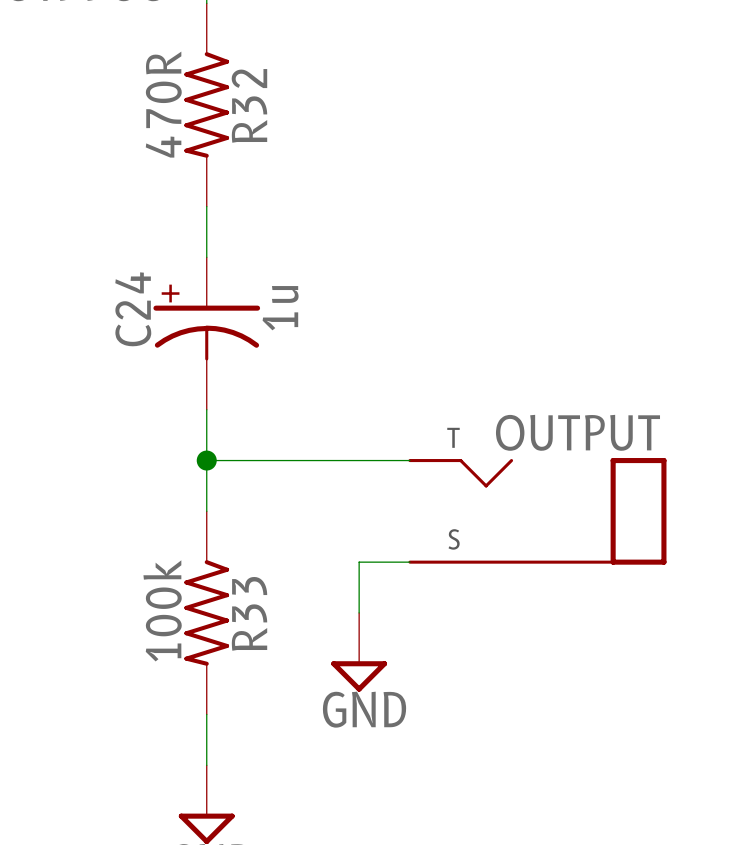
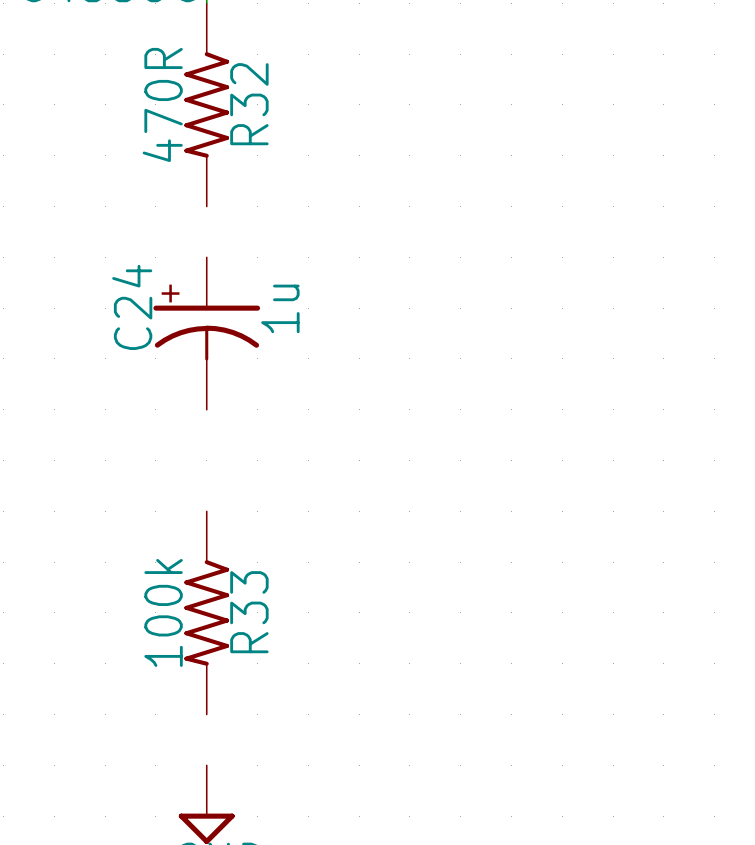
wire: (206, 206) (206, 257) -> none
wire: (206, 409) (206, 511) -> none
wire: (206, 460) (409, 460) -> none
junction: (206, 460) -> none
OUTPUT: (537, 511) -> none
wire: (409, 562) (359, 562) (359, 612) -> none
power symbol: GND (359, 652) -> none
wire: (206, 714) (206, 765) -> none

